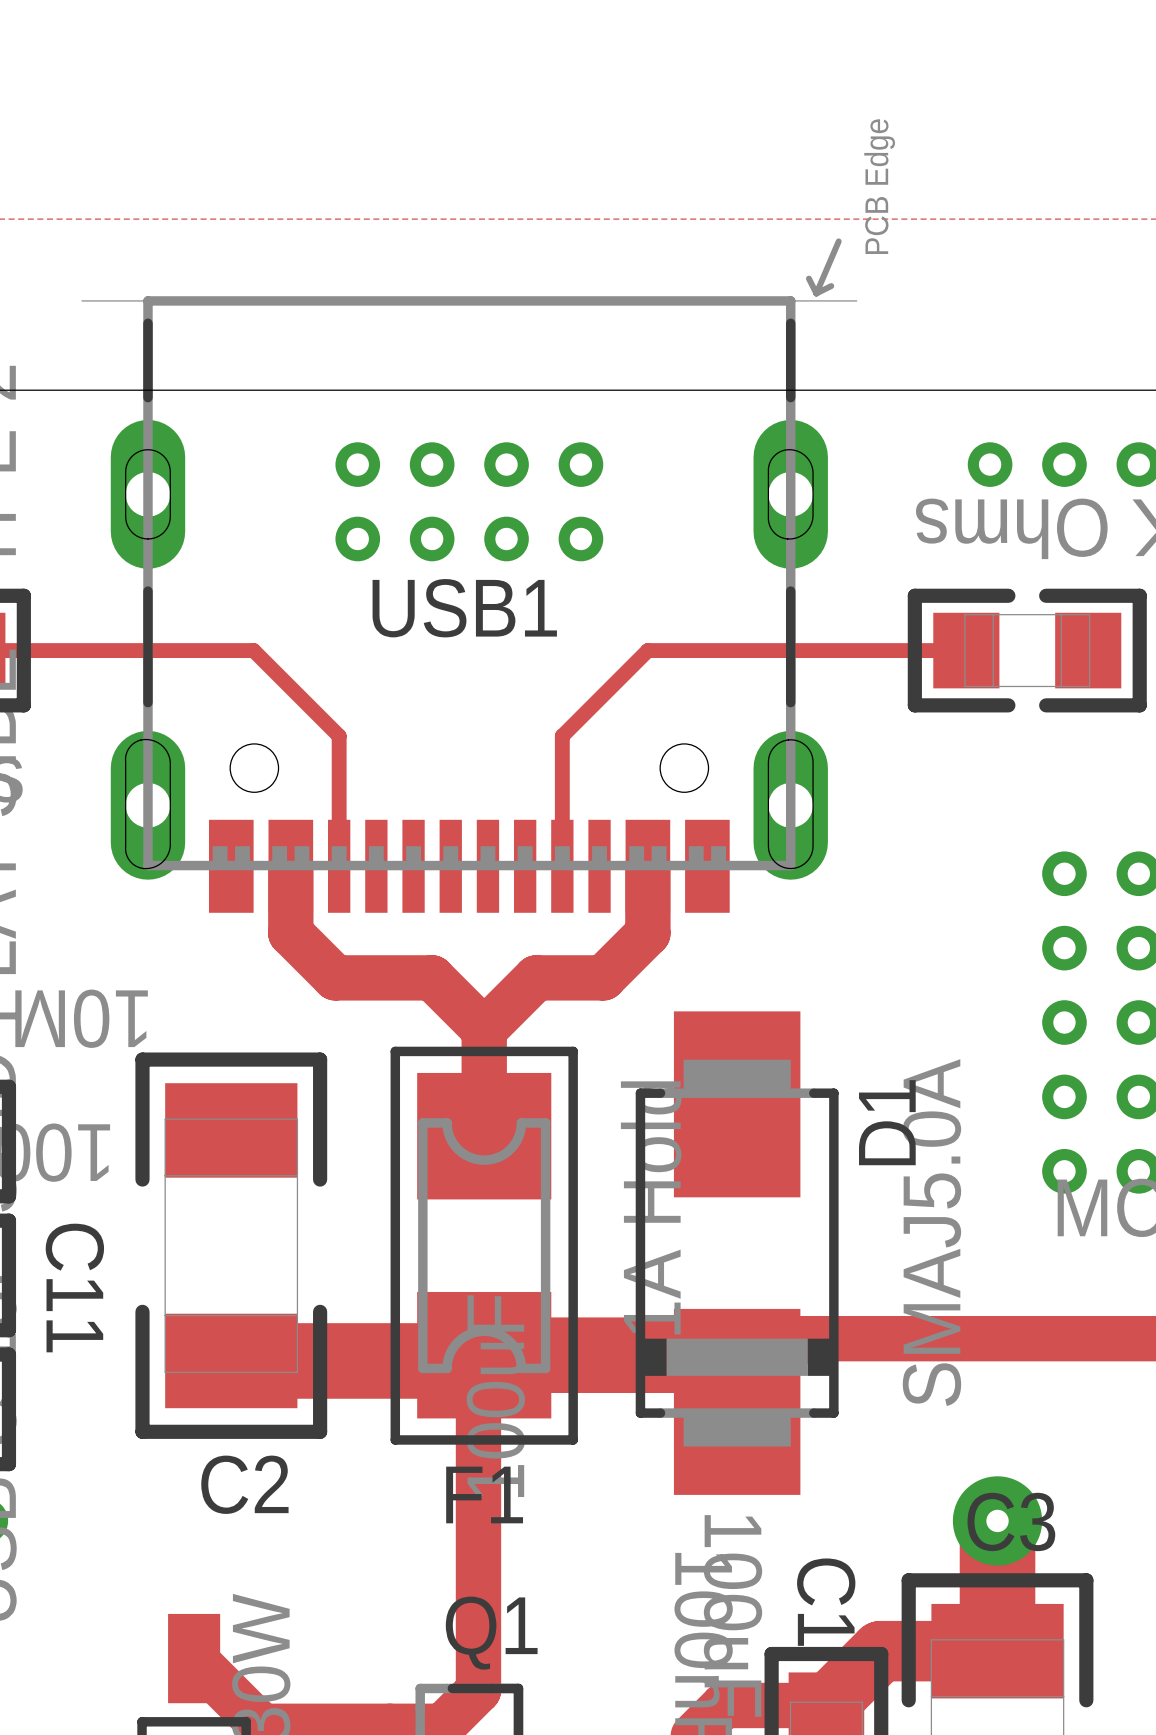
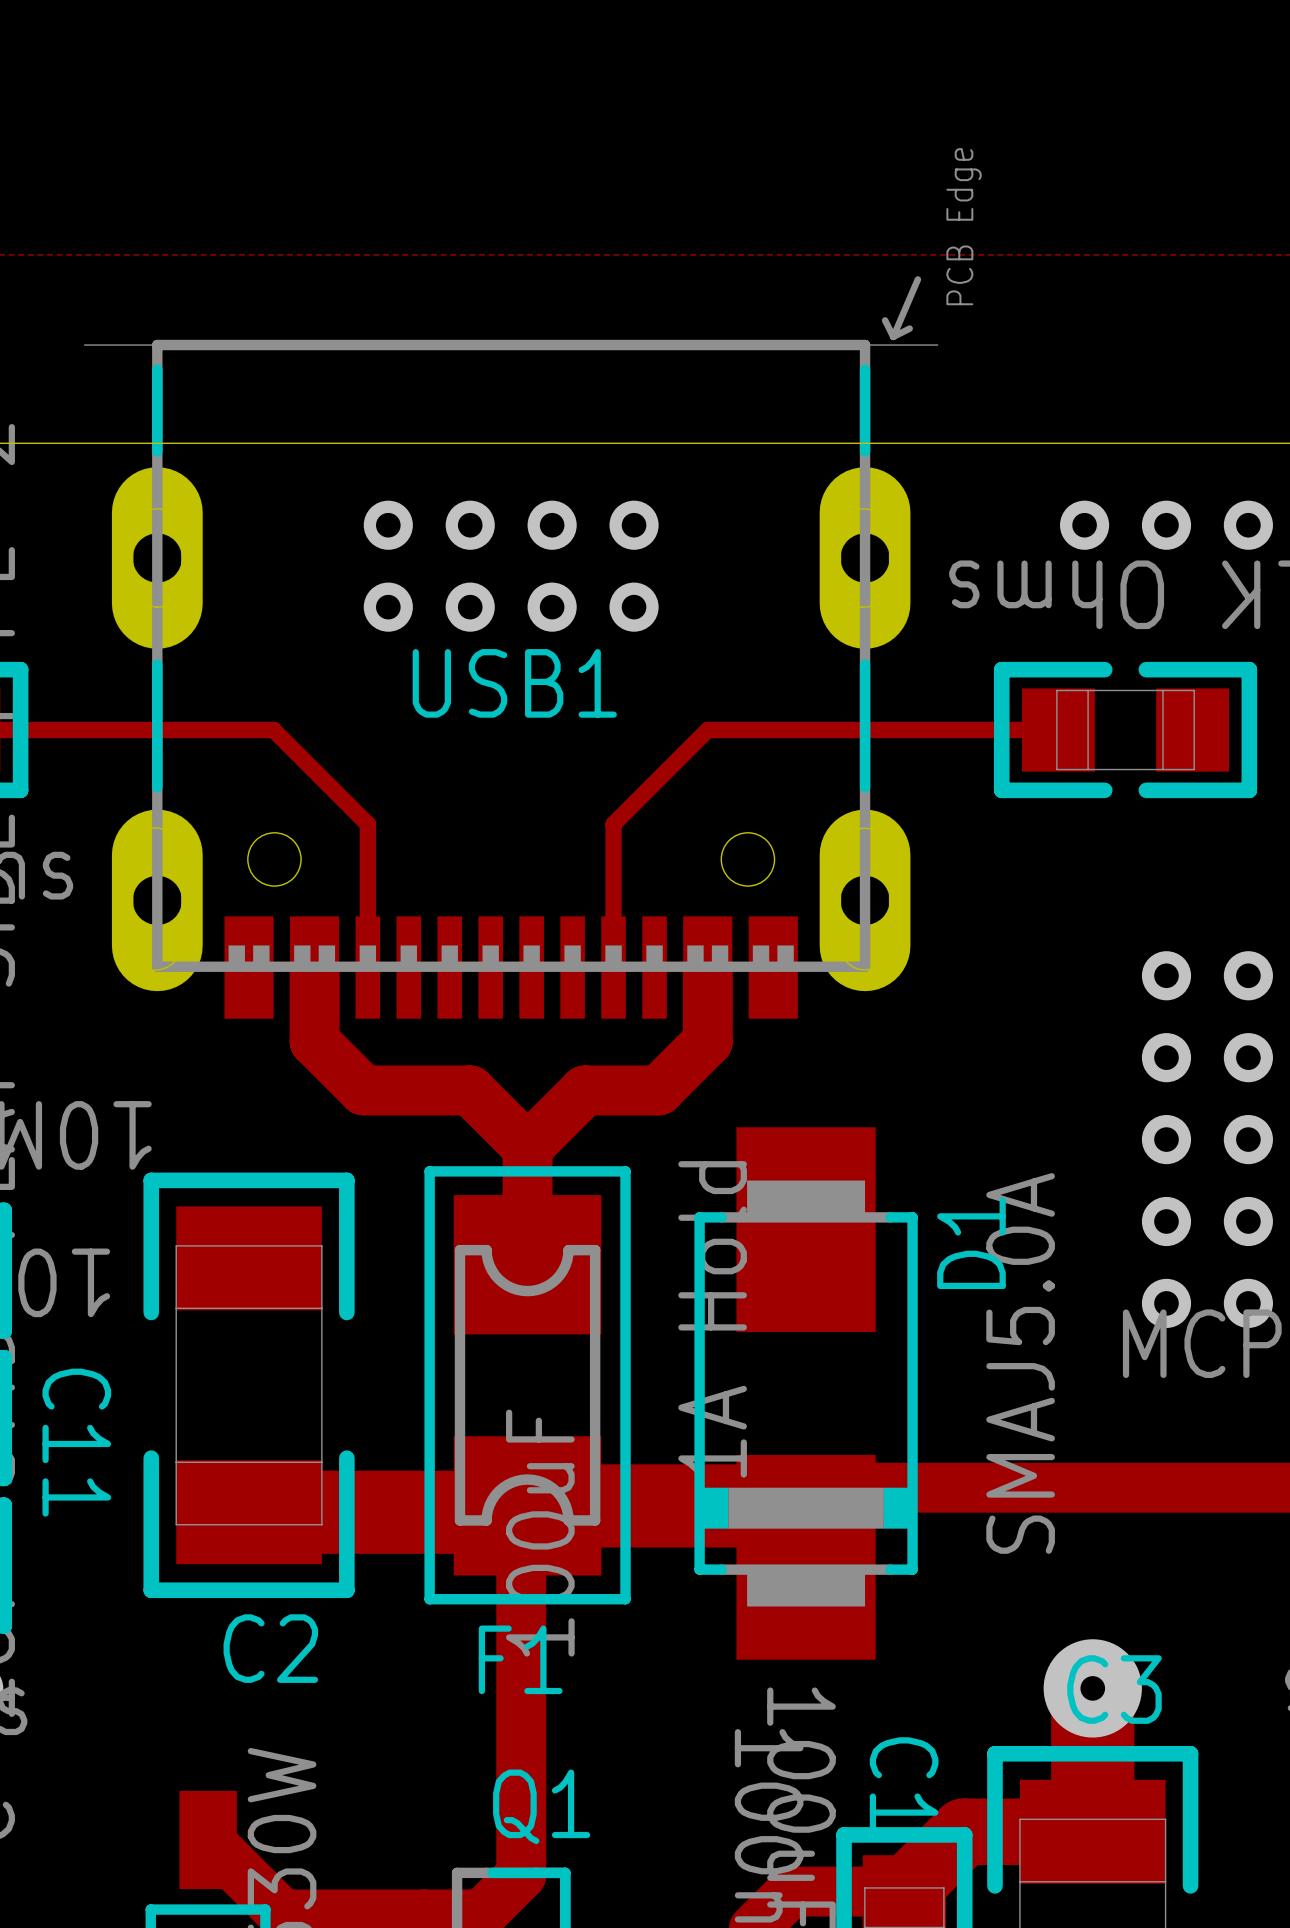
USB1 footprint: [82, 238, 857, 913] -> [84, 276, 938, 1019]

